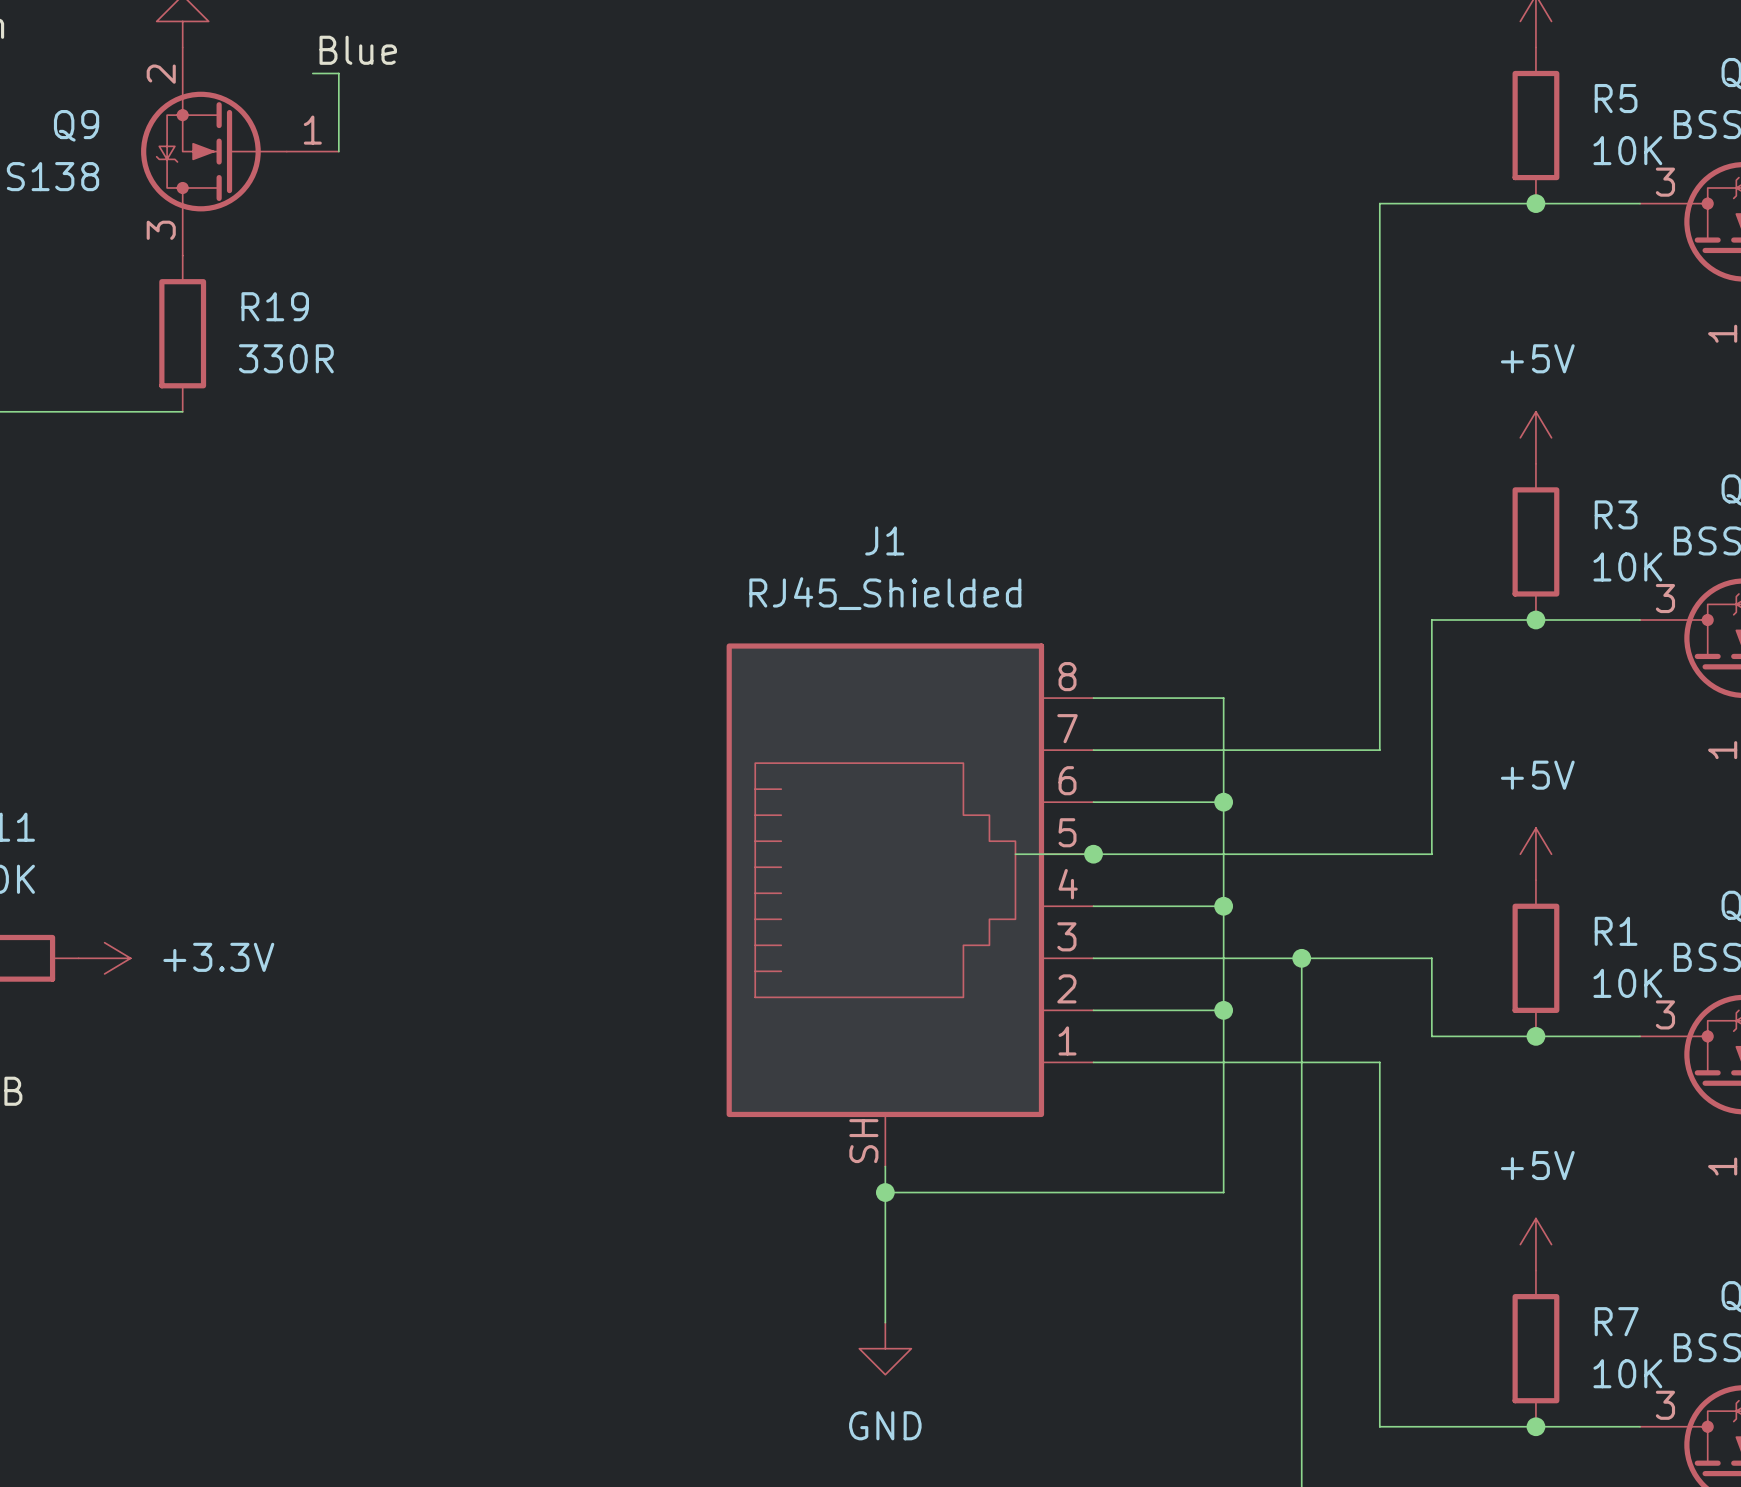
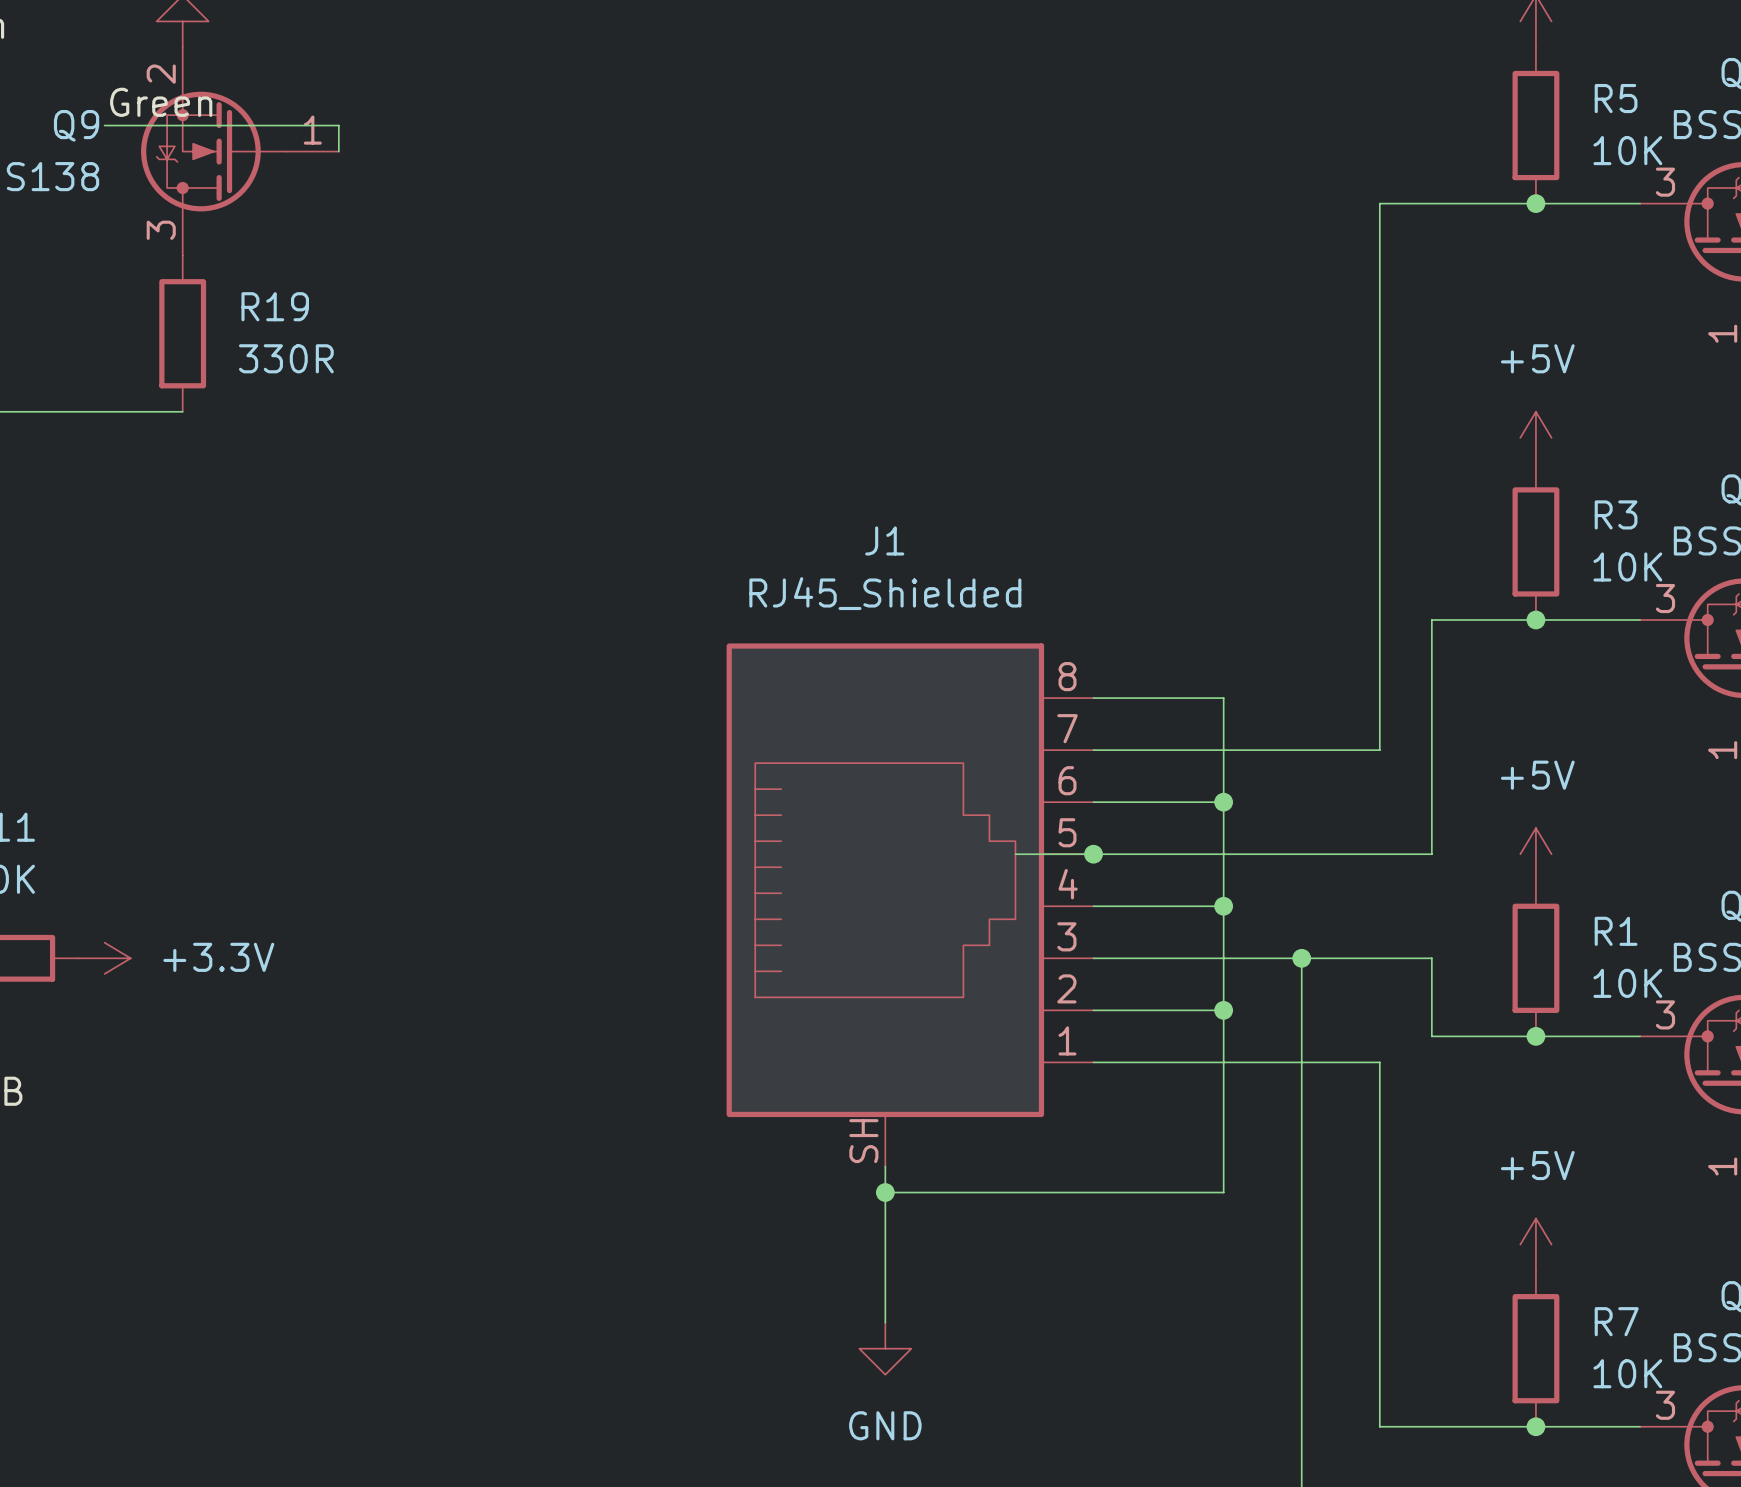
label: Blue (358, 50) -> none
wire: (312, 73) (338, 73) (338, 125) -> (104, 125) (338, 125)
label: none -> Green (161, 102)

